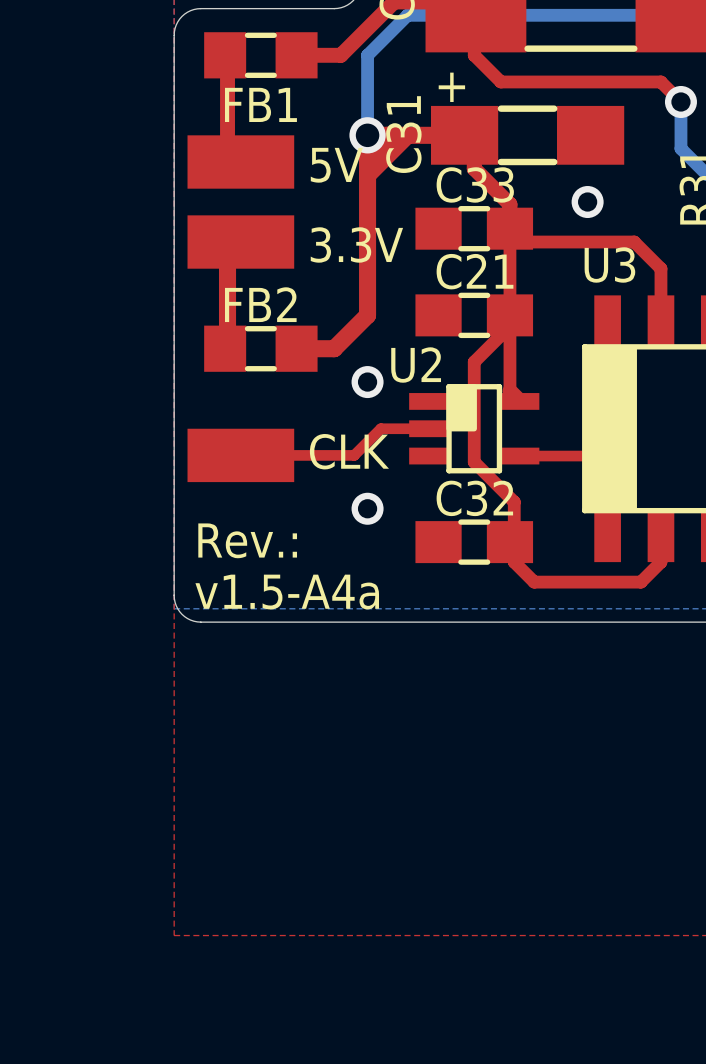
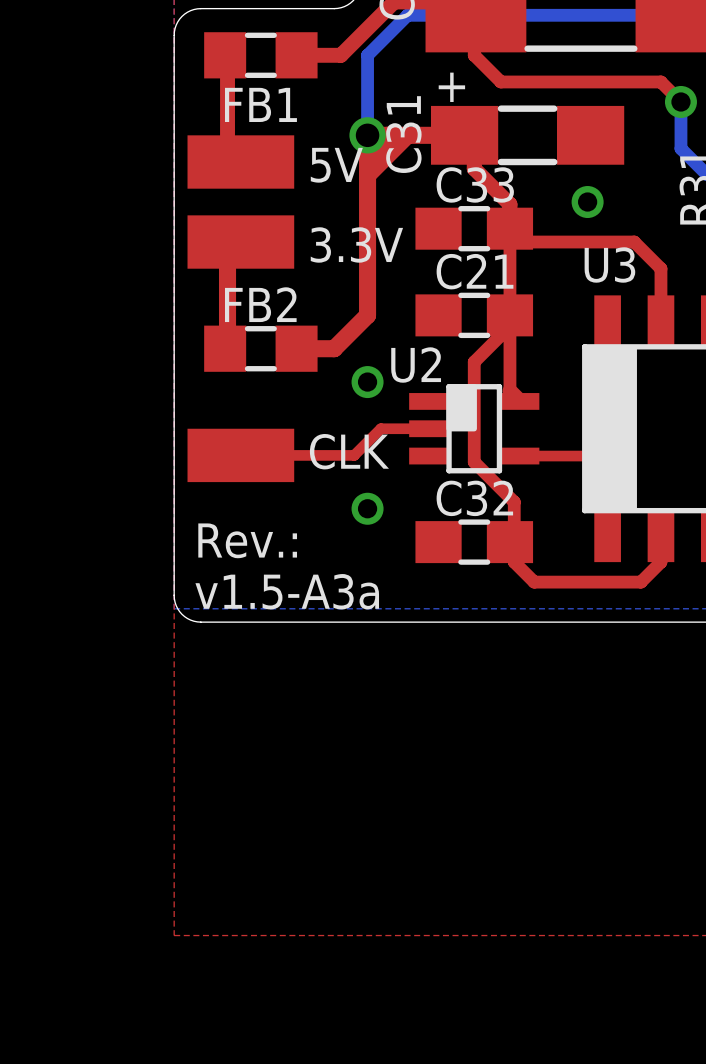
text: v1.5-A4a (287, 592) -> v1.5-A3a (287, 591)

